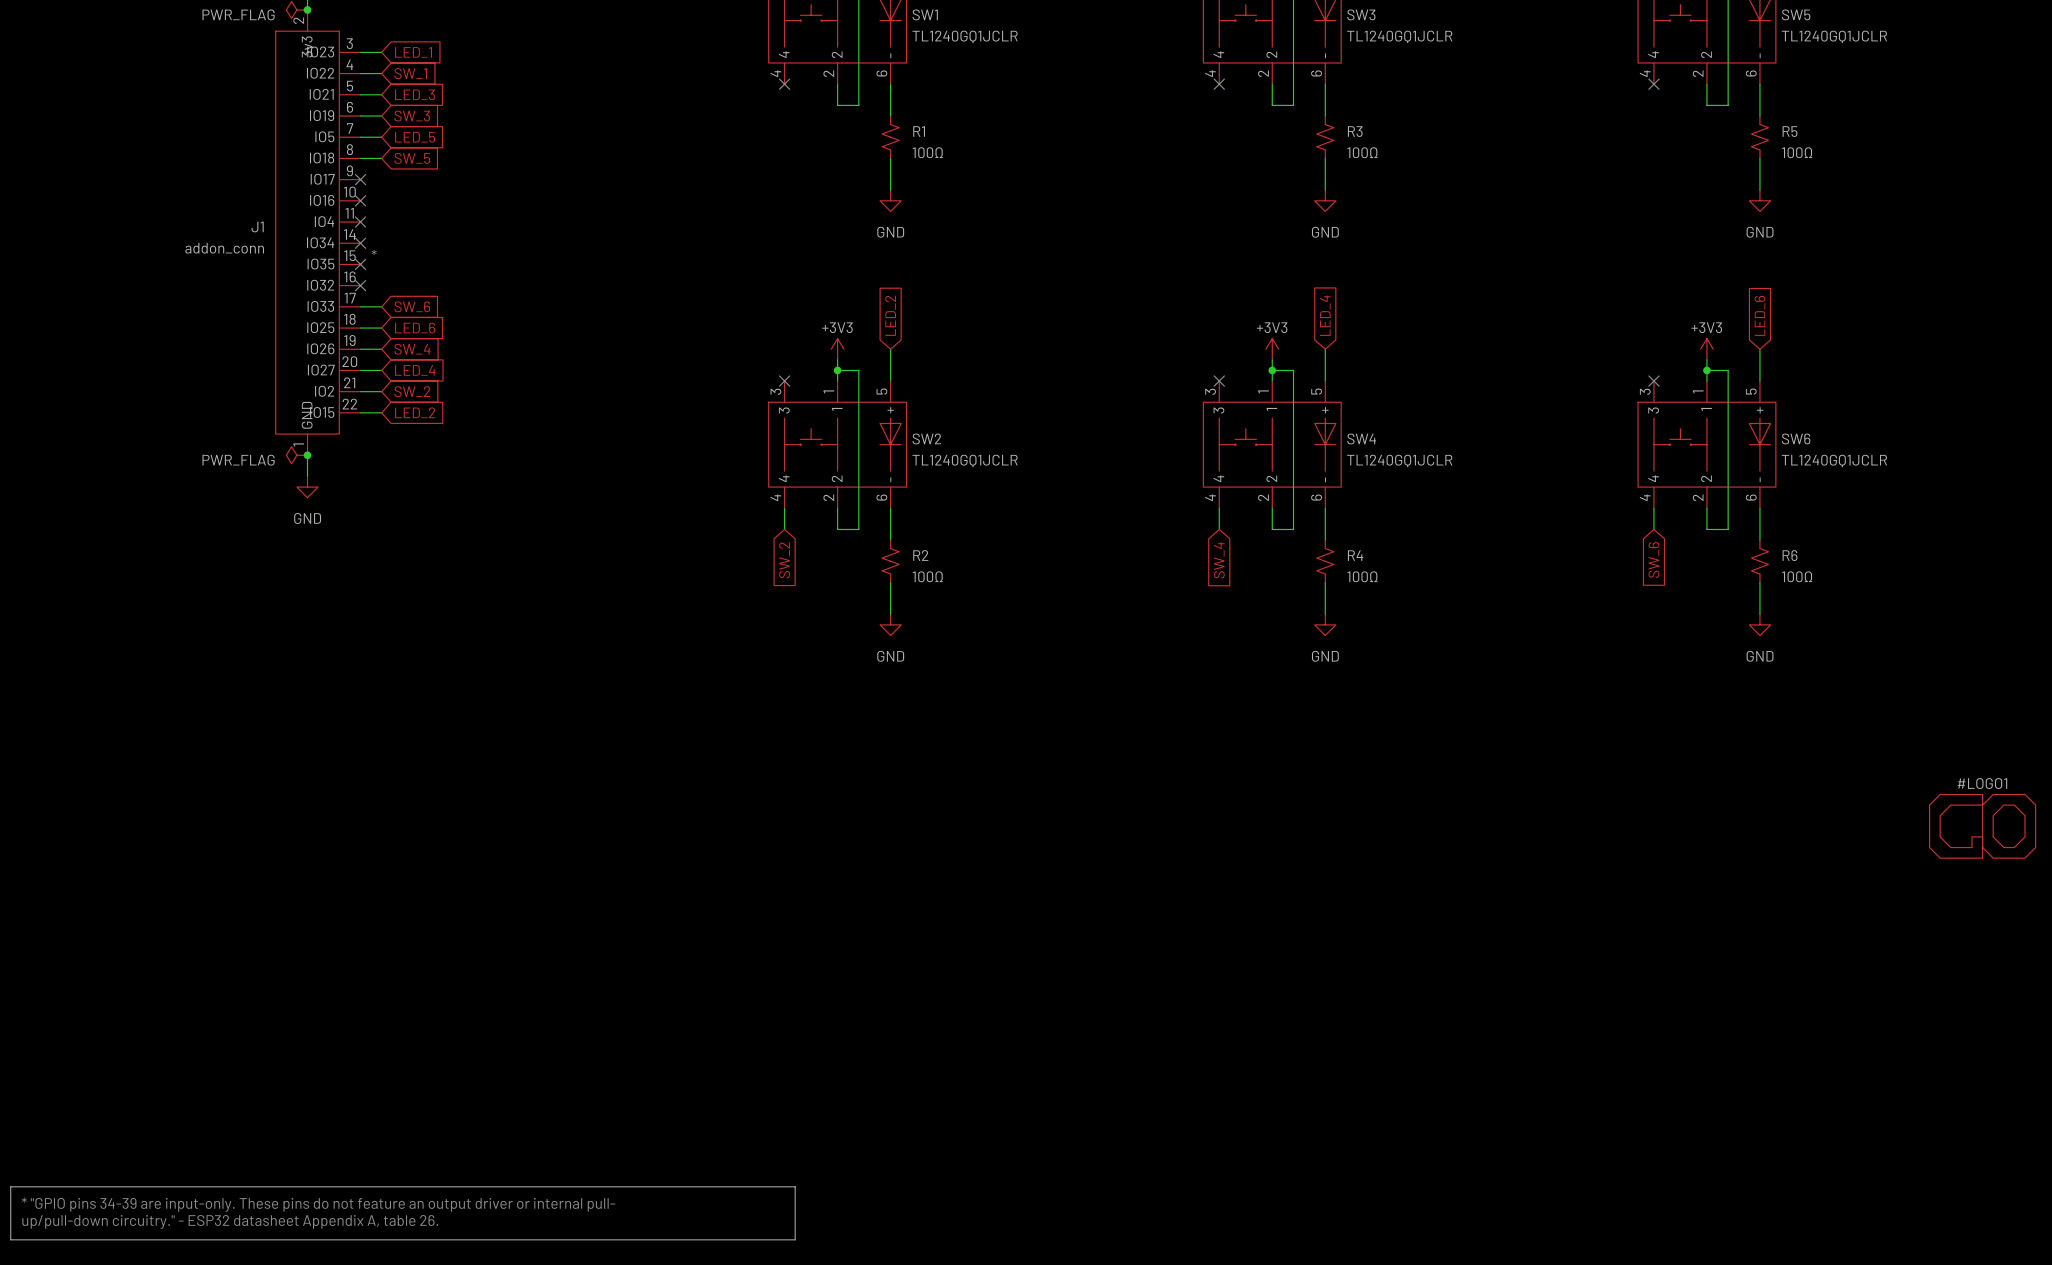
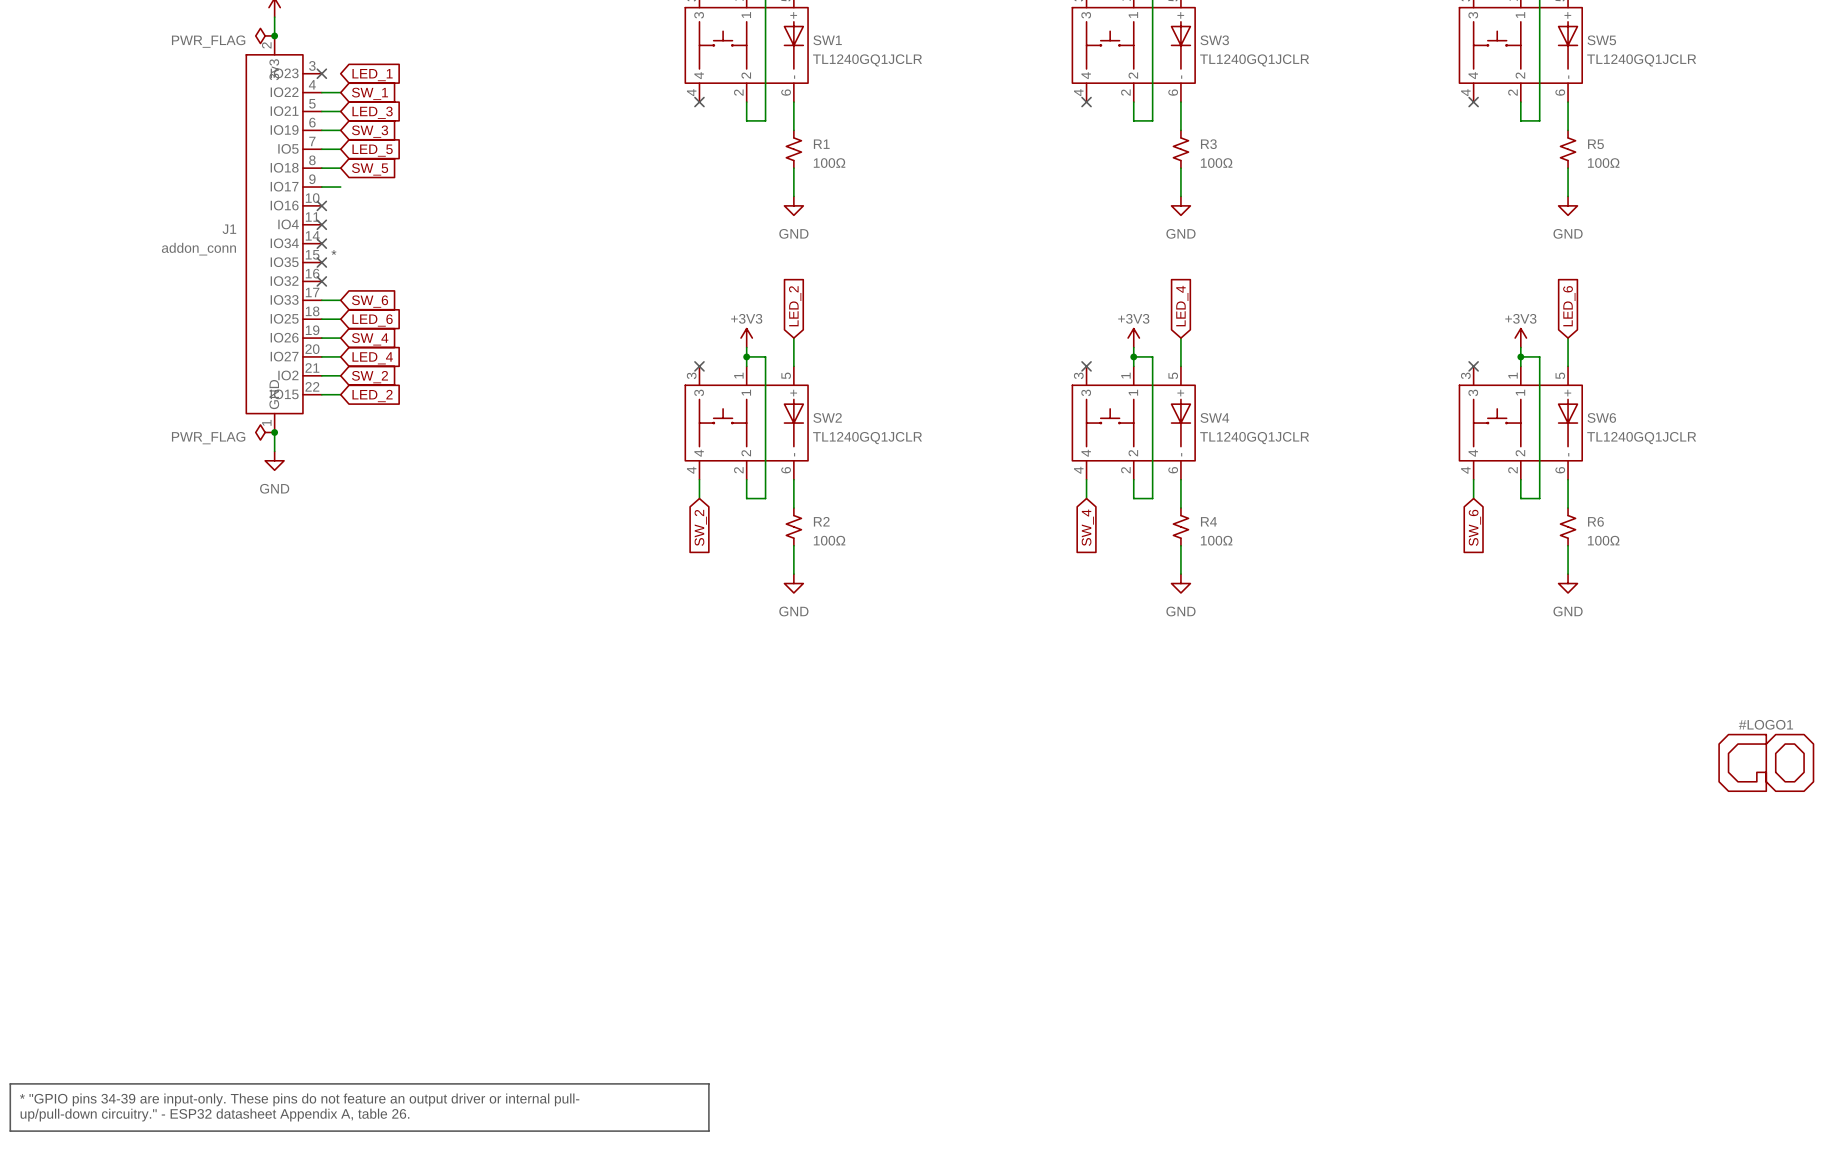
wire: (360, 52) (381, 52) -> (321, 187) (340, 187)
no-connect mark: none -> (321, 73)
no-connect mark: (360, 179) -> none

